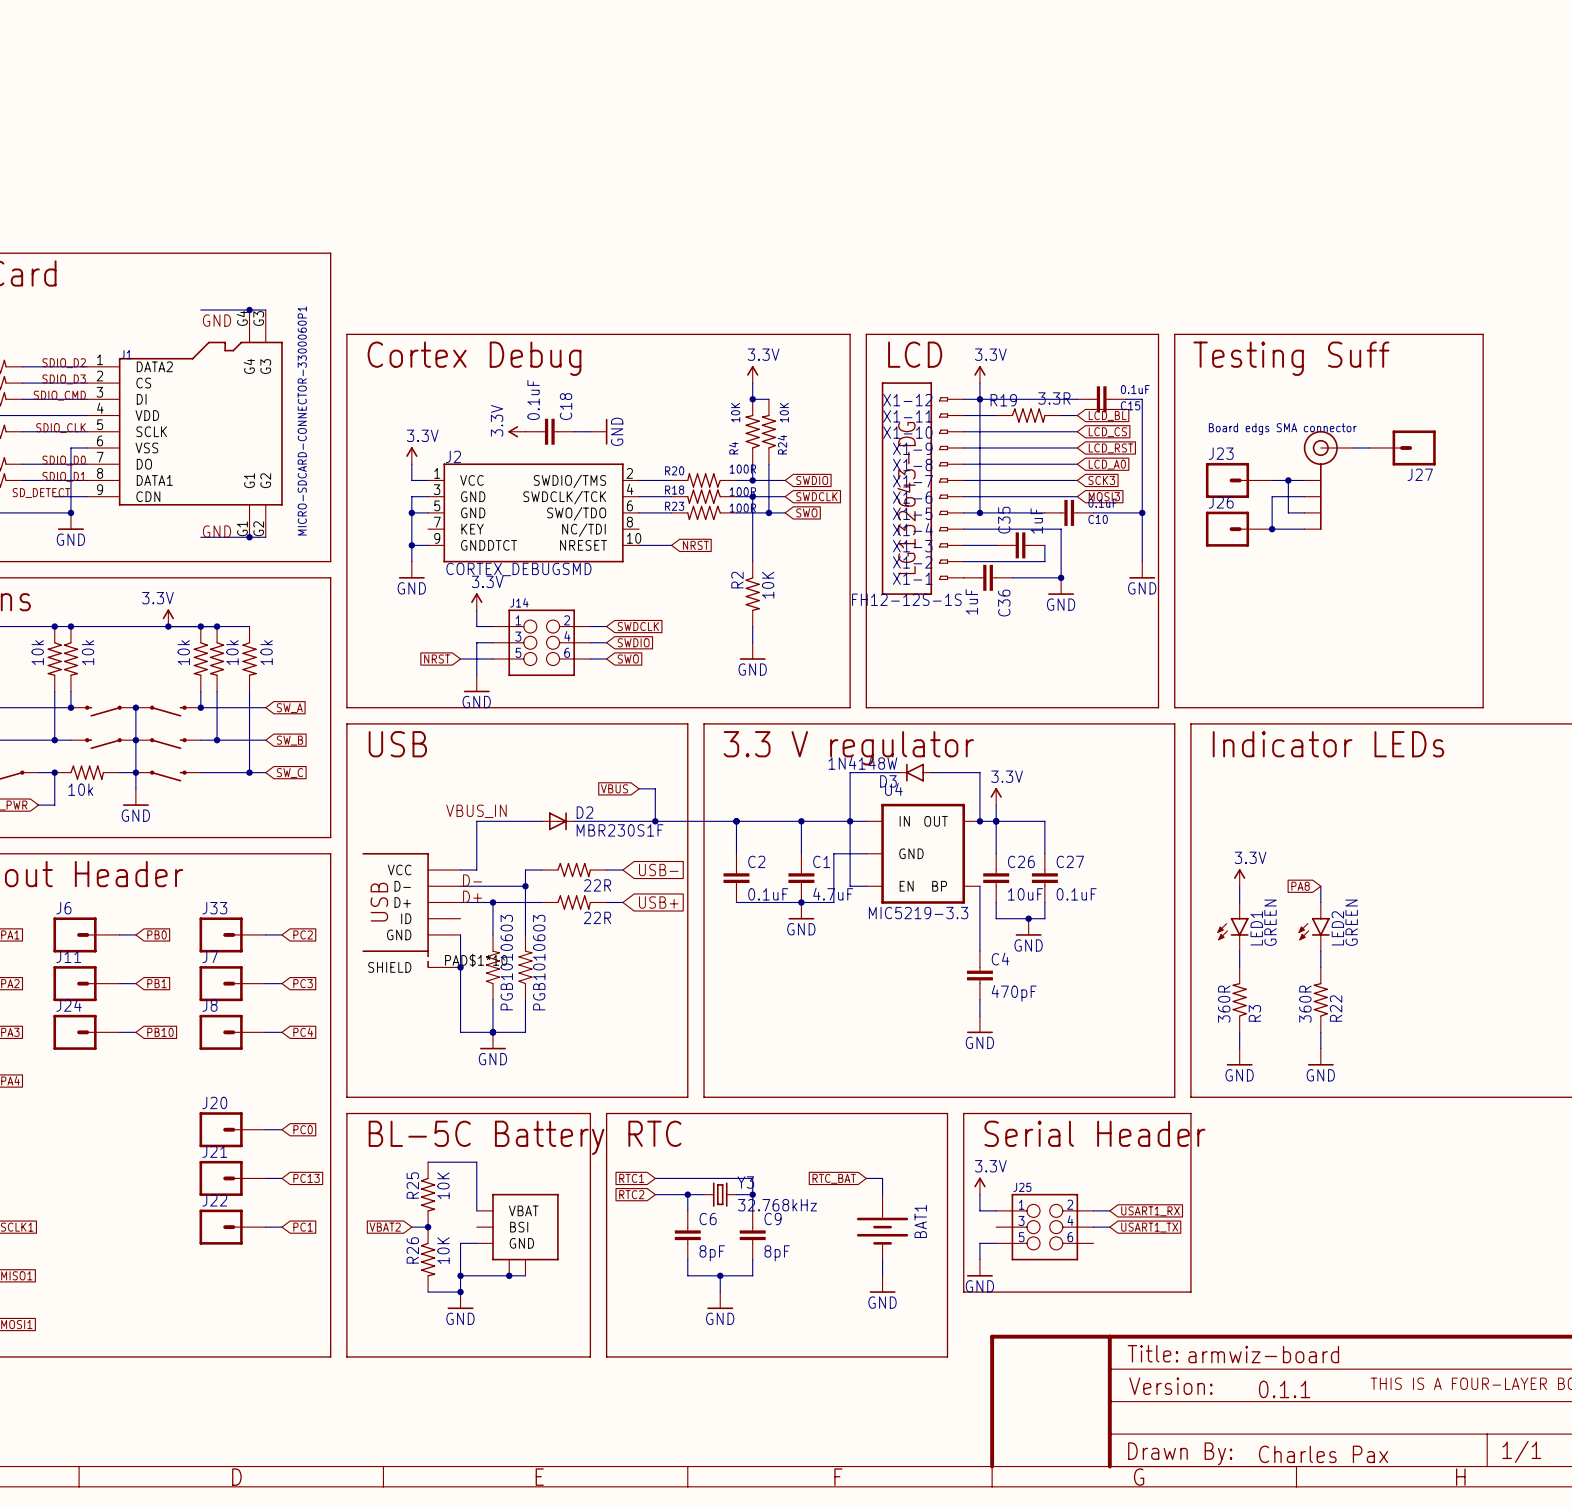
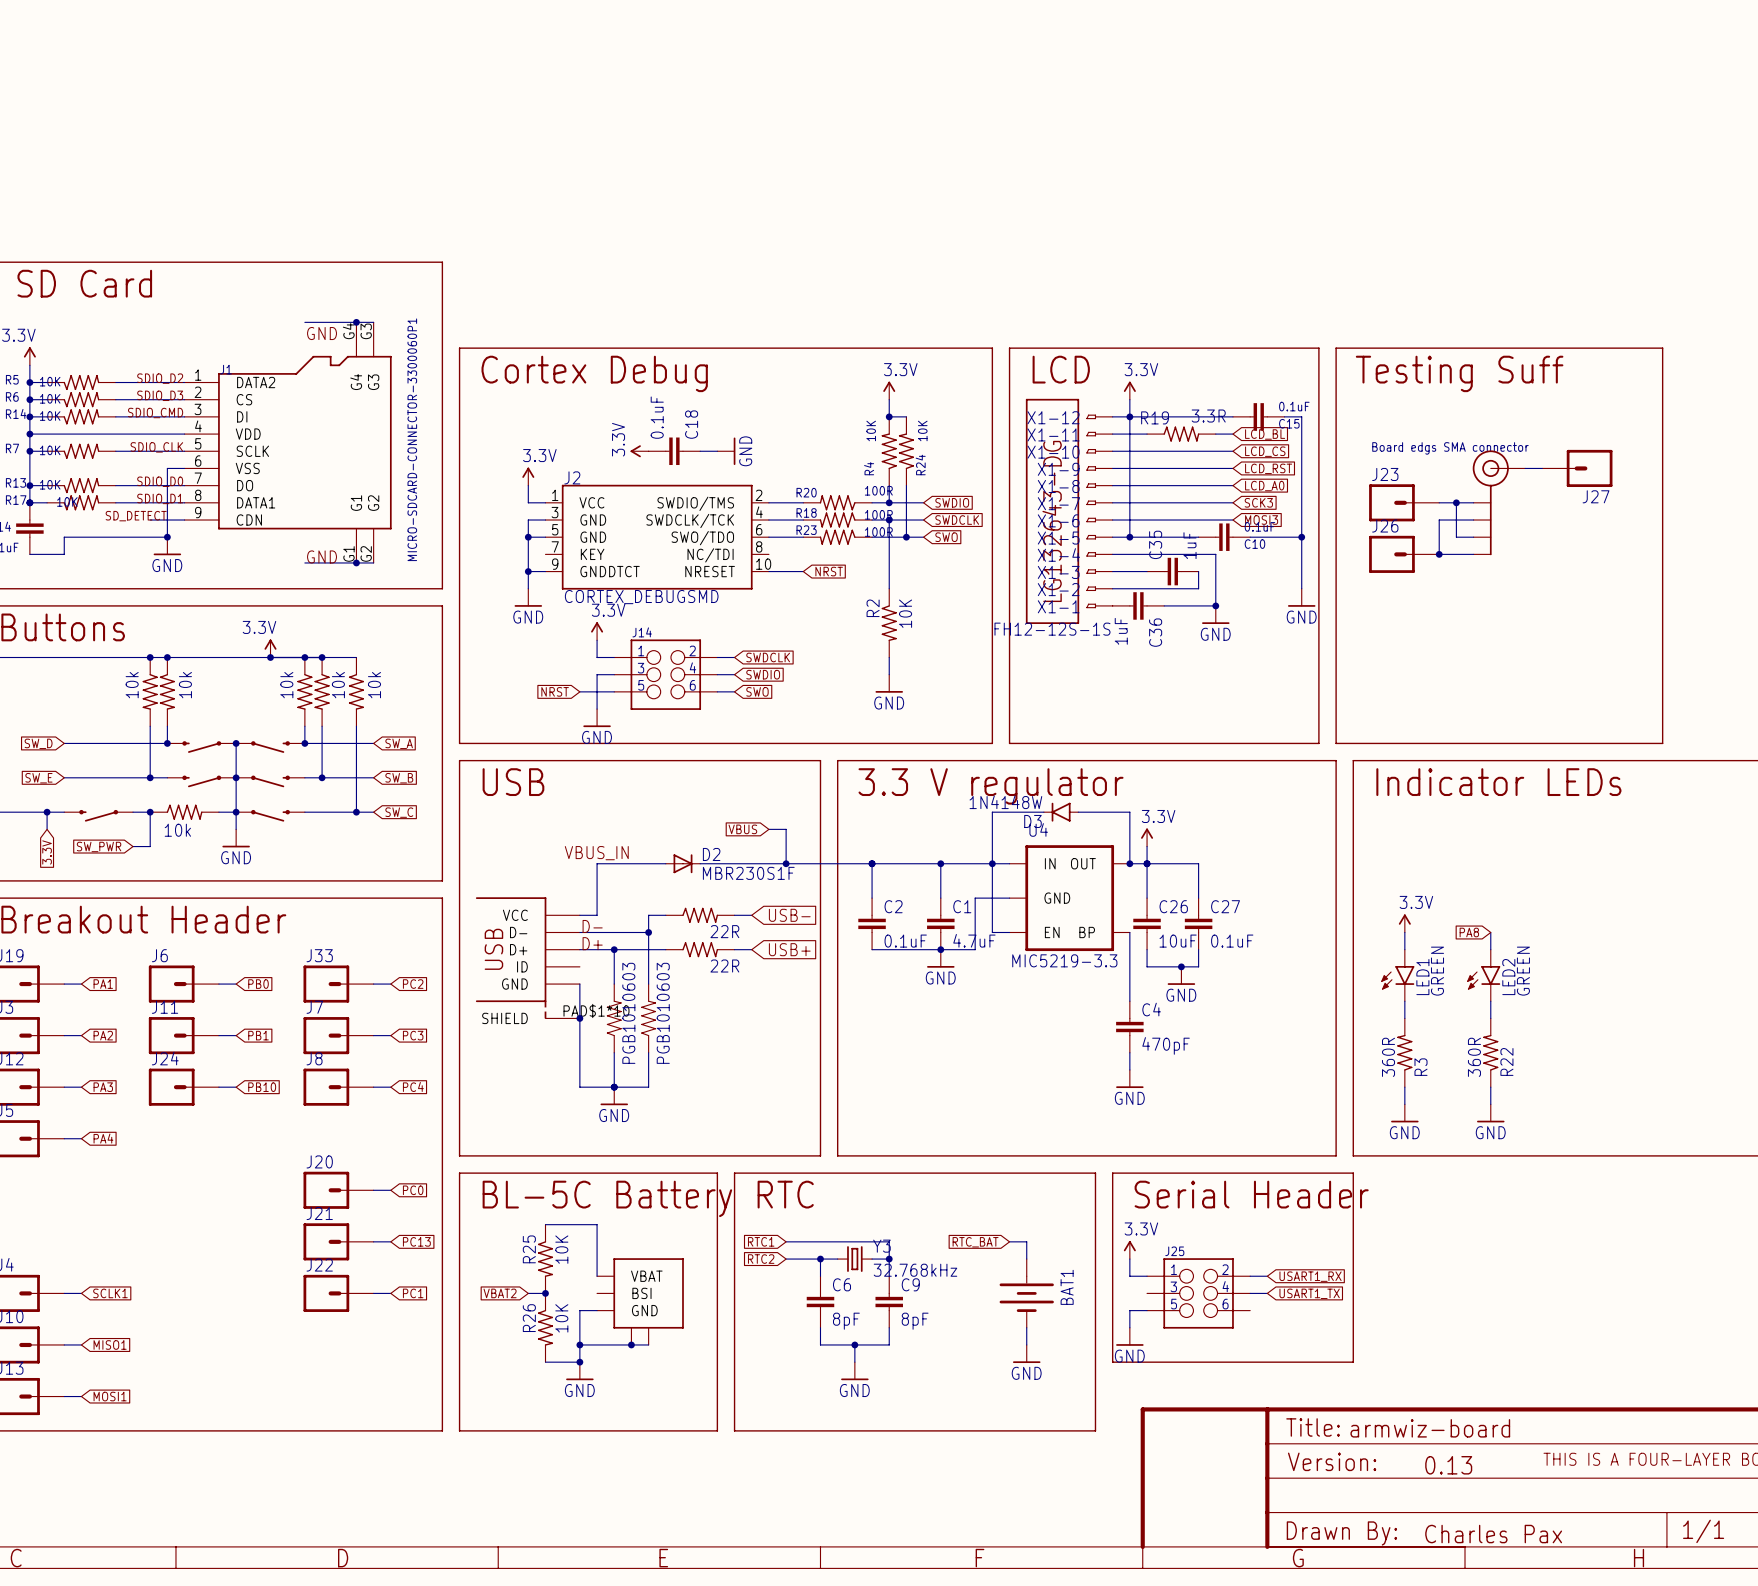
text: 0.1.1 (1284, 1389) -> 0.13 (1448, 1465)

